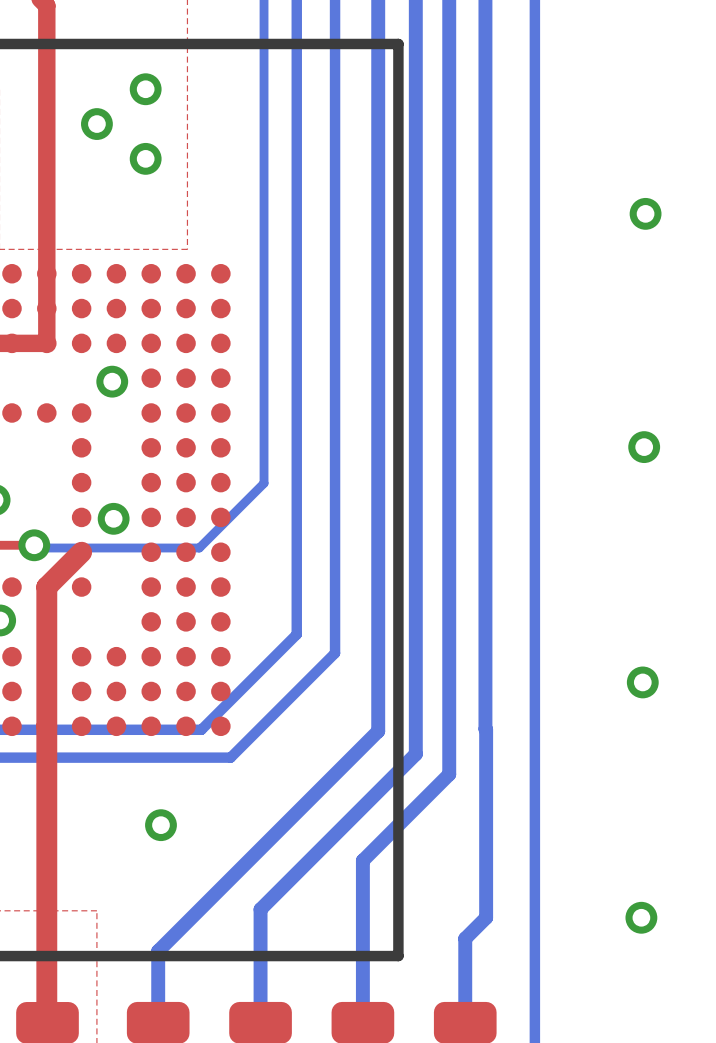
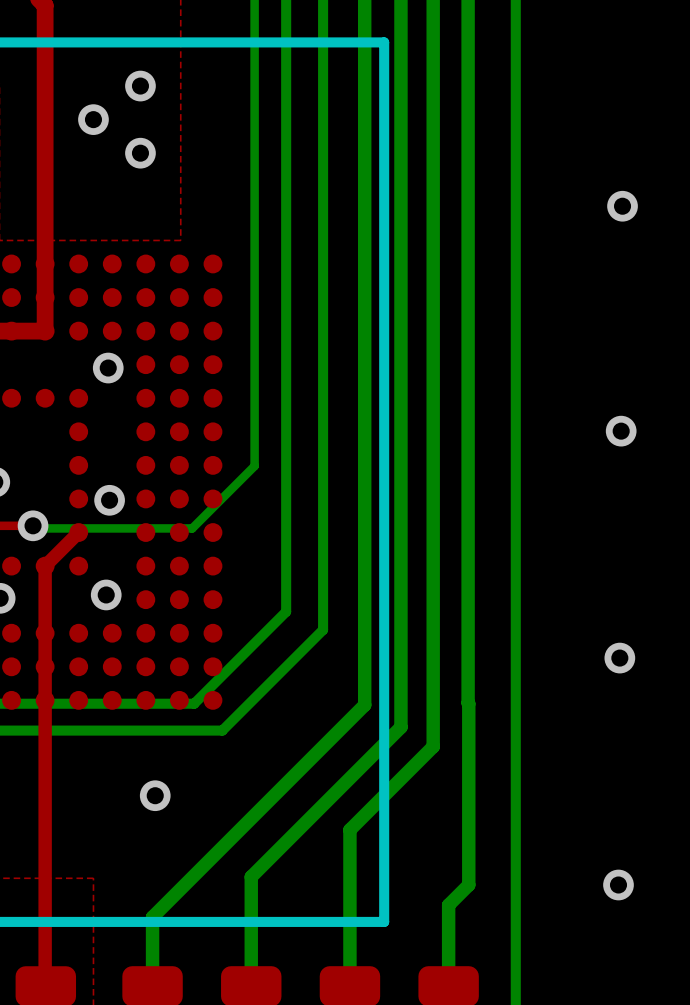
top track width: thick (81, 552) (46, 587) (46, 1025) -> thin (78, 532) (45, 566) (45, 989)
via: none -> (106, 594)

